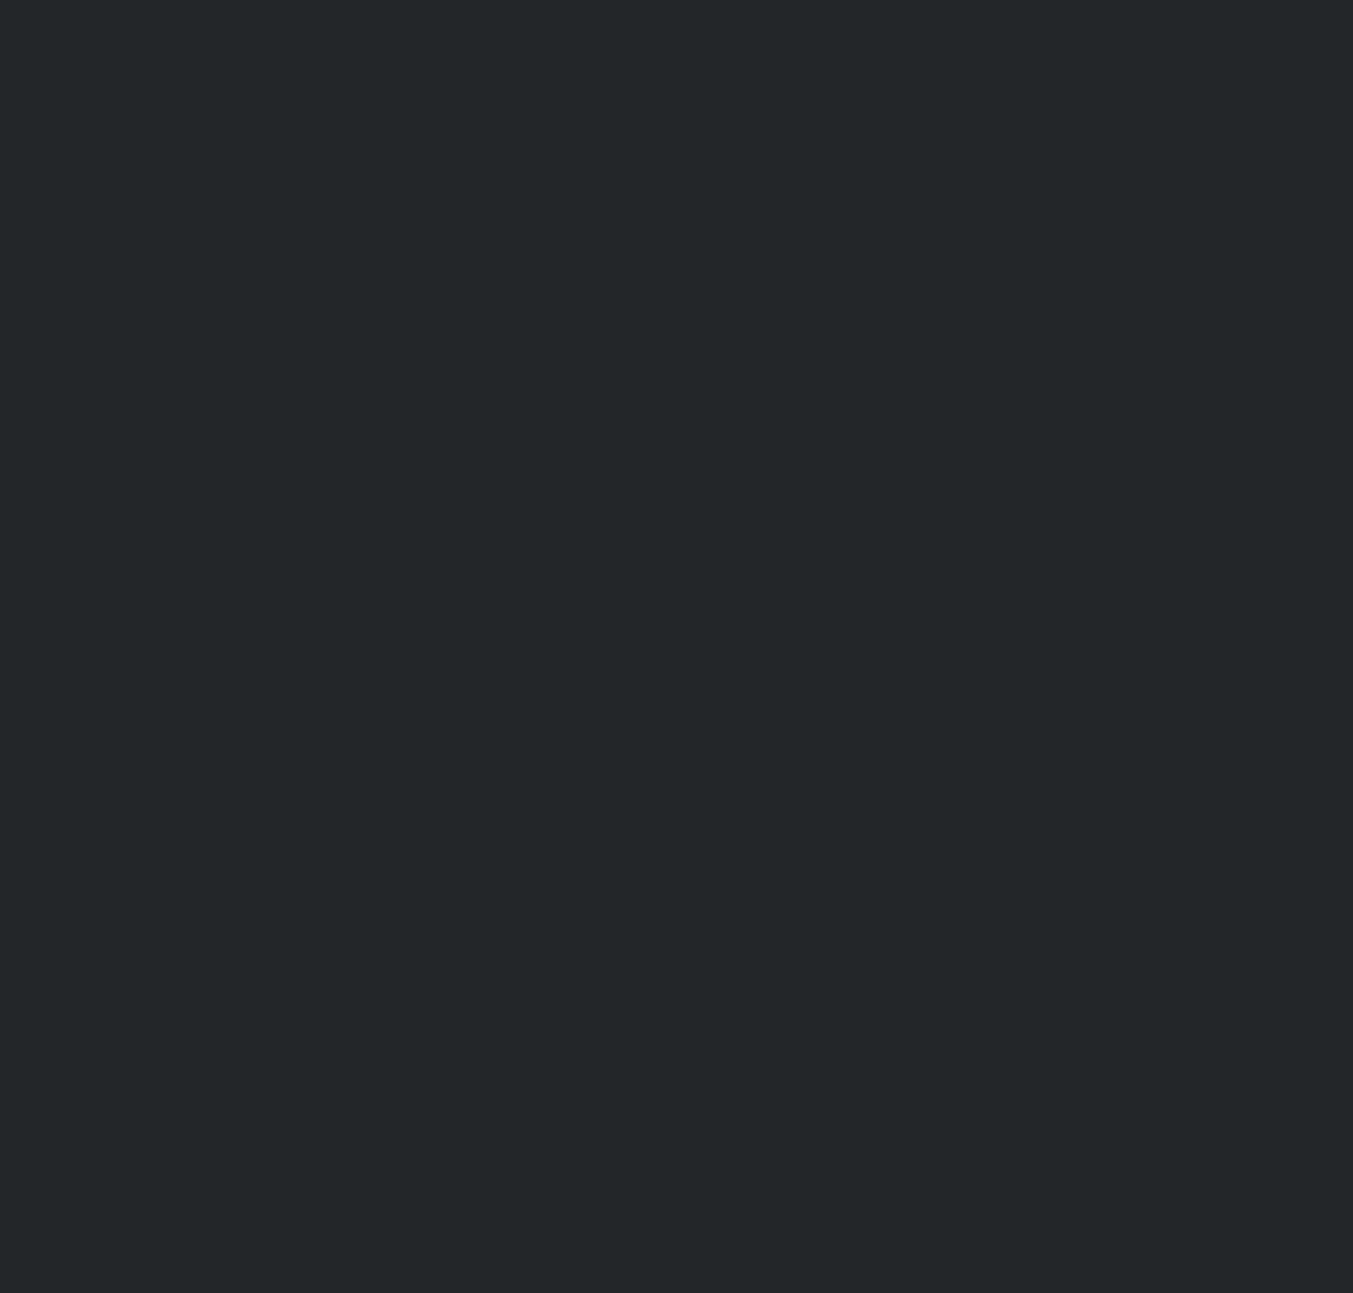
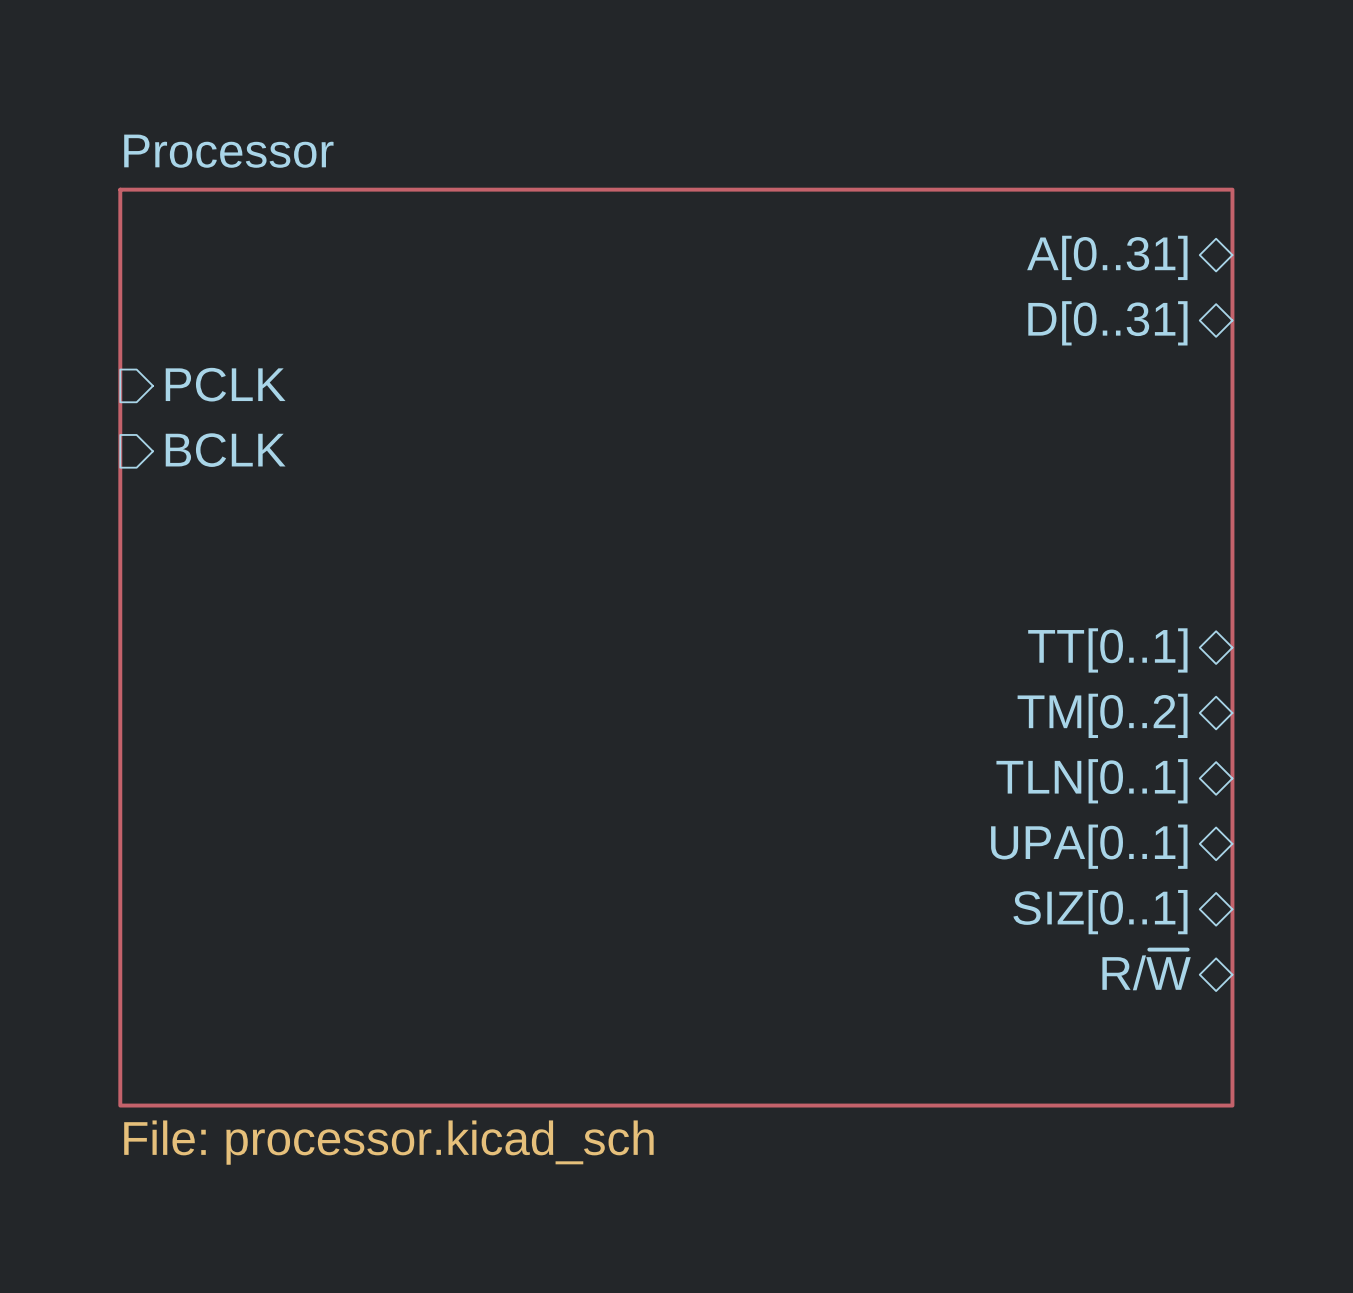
sheet pin: none -> A[0..31] (1107, 257)
sheet pin: none -> D[0..31] (1107, 323)
sheet pin: none -> PCLK (225, 384)
sheet pin: none -> BCLK (225, 450)
sheet Processor: none -> File: processor.kicad_sch (676, 647)
sheet pin: none -> TT[0..1] (1107, 650)
sheet pin: none -> TM[0..2] (1102, 715)
sheet pin: none -> TLN[0..1] (1091, 781)
sheet pin: none -> UPA[0..1] (1089, 846)
sheet pin: none -> SIZ[0..1] (1100, 912)
sheet pin: none -> R/~{W} (1146, 969)

